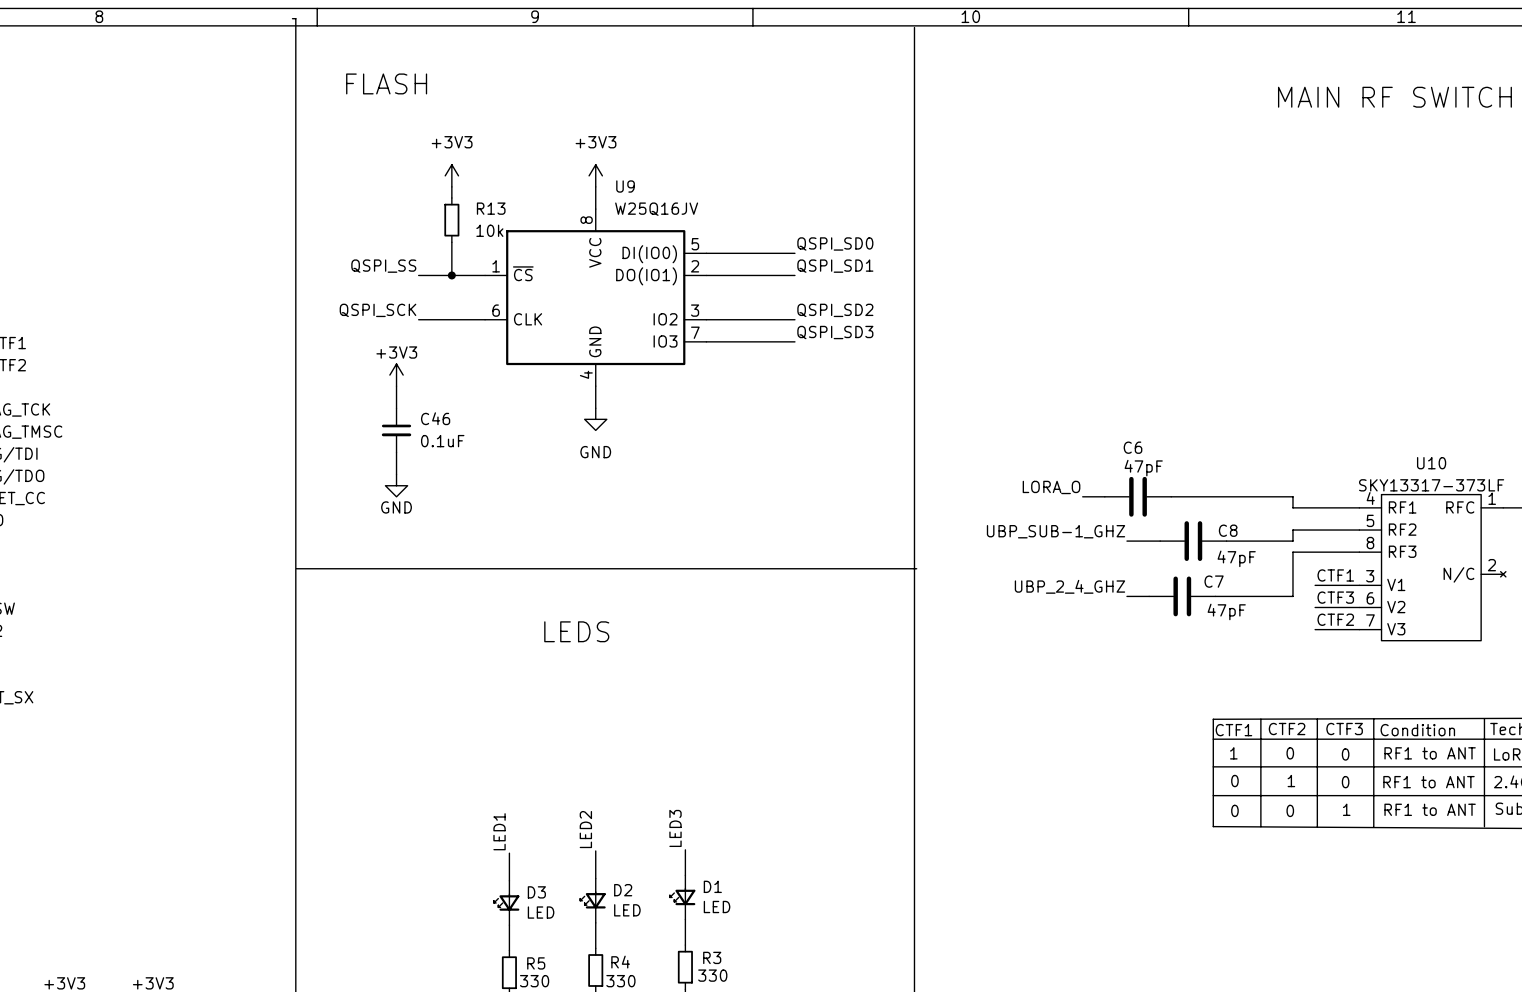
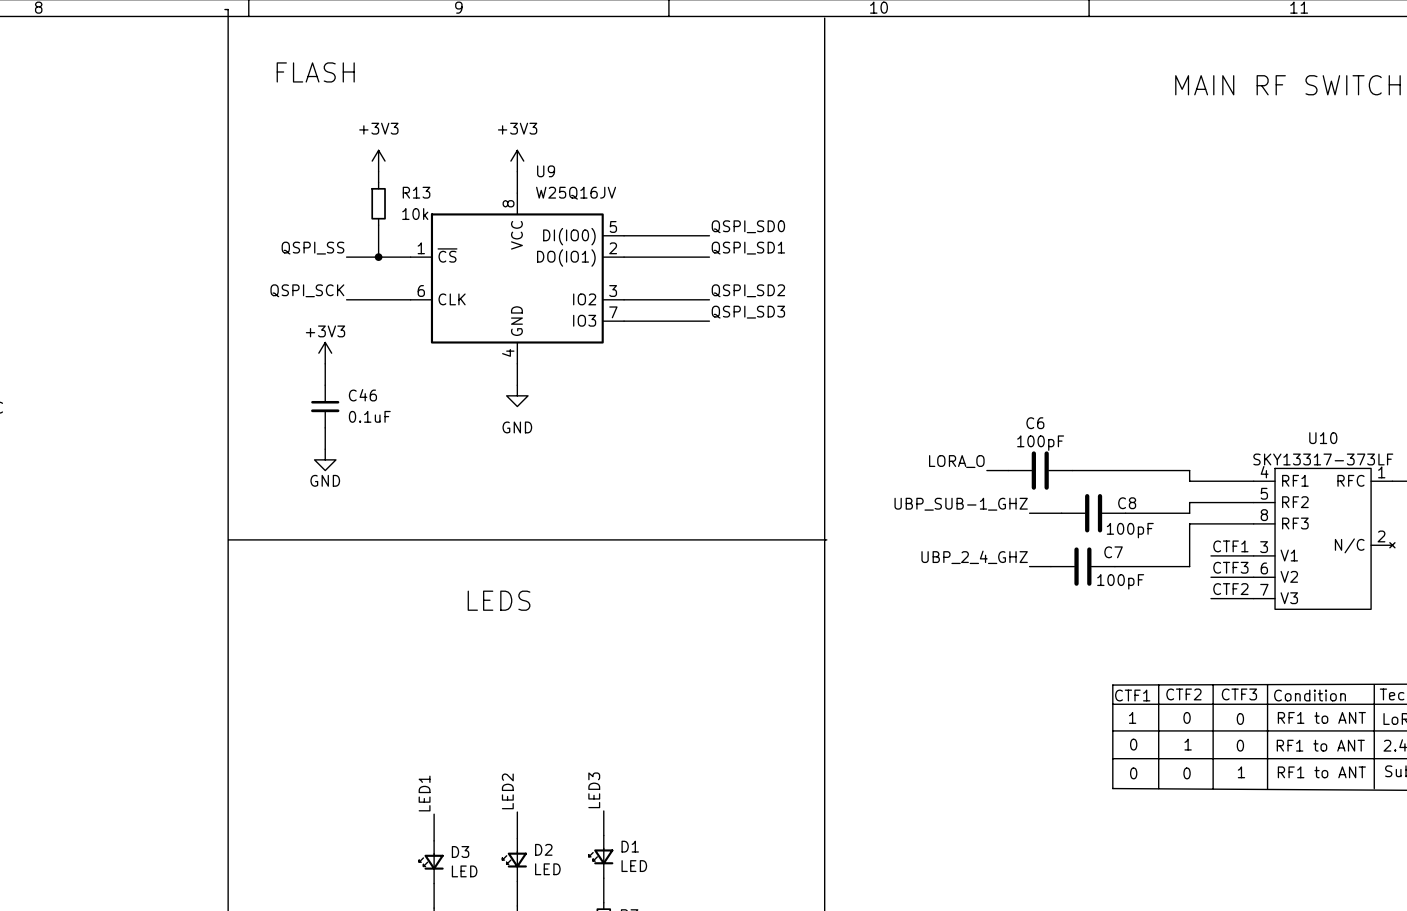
C6 value: 47pF (1143, 468) -> 100pF (1040, 443)
C8 value: 47pF (1236, 558) -> 100pF (1130, 530)
C7 value: 47pF (1226, 611) -> 100pF (1120, 581)

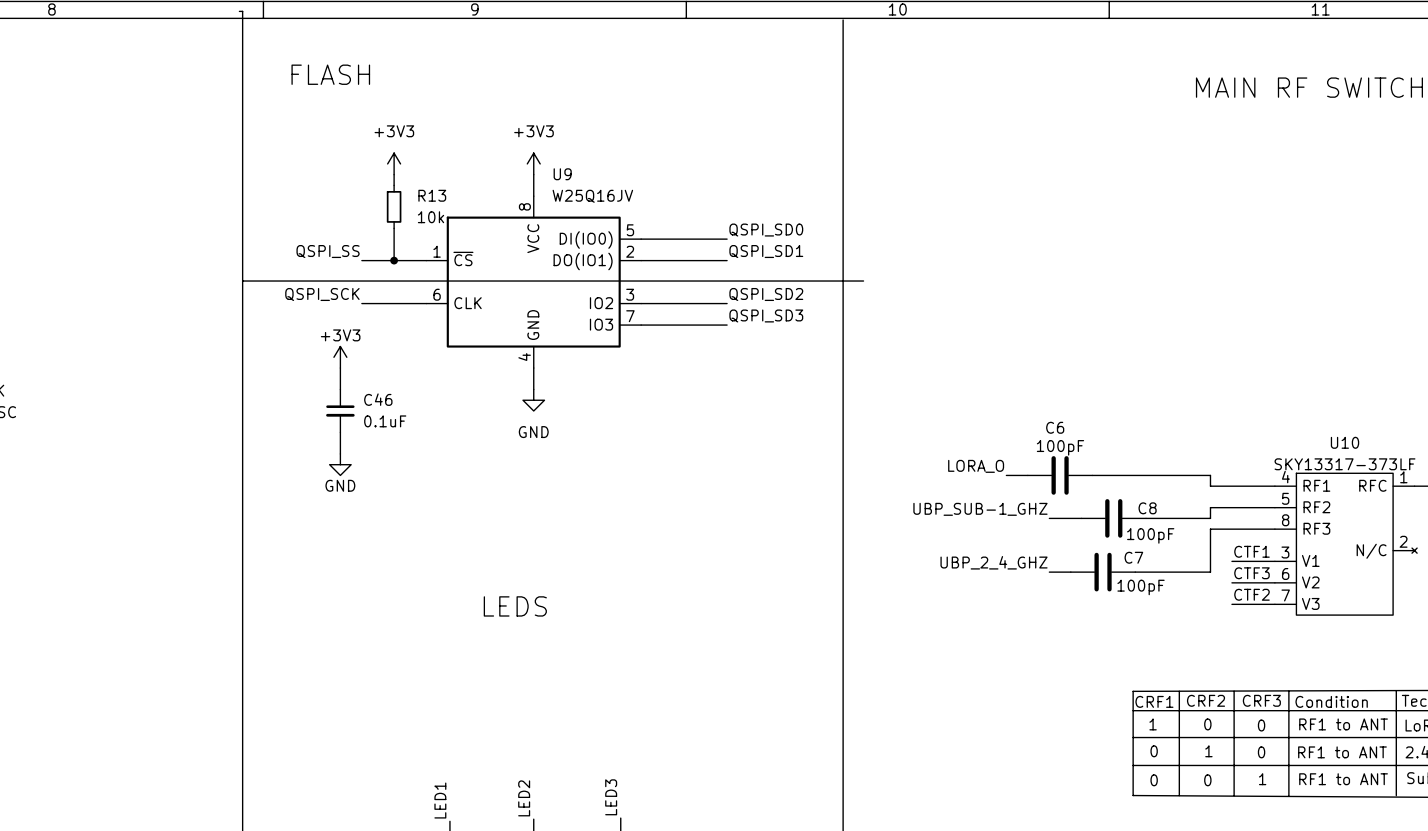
line: none -> (242, 281) (863, 281)
line: (229, 539) (826, 539) -> none
text: CTF2 (1183, 694) -> CRF2 (1206, 700)
text: CTF3 (1239, 694) -> CRF3 (1261, 700)
text: CTF1 (1132, 695) -> CRF1 (1154, 701)

